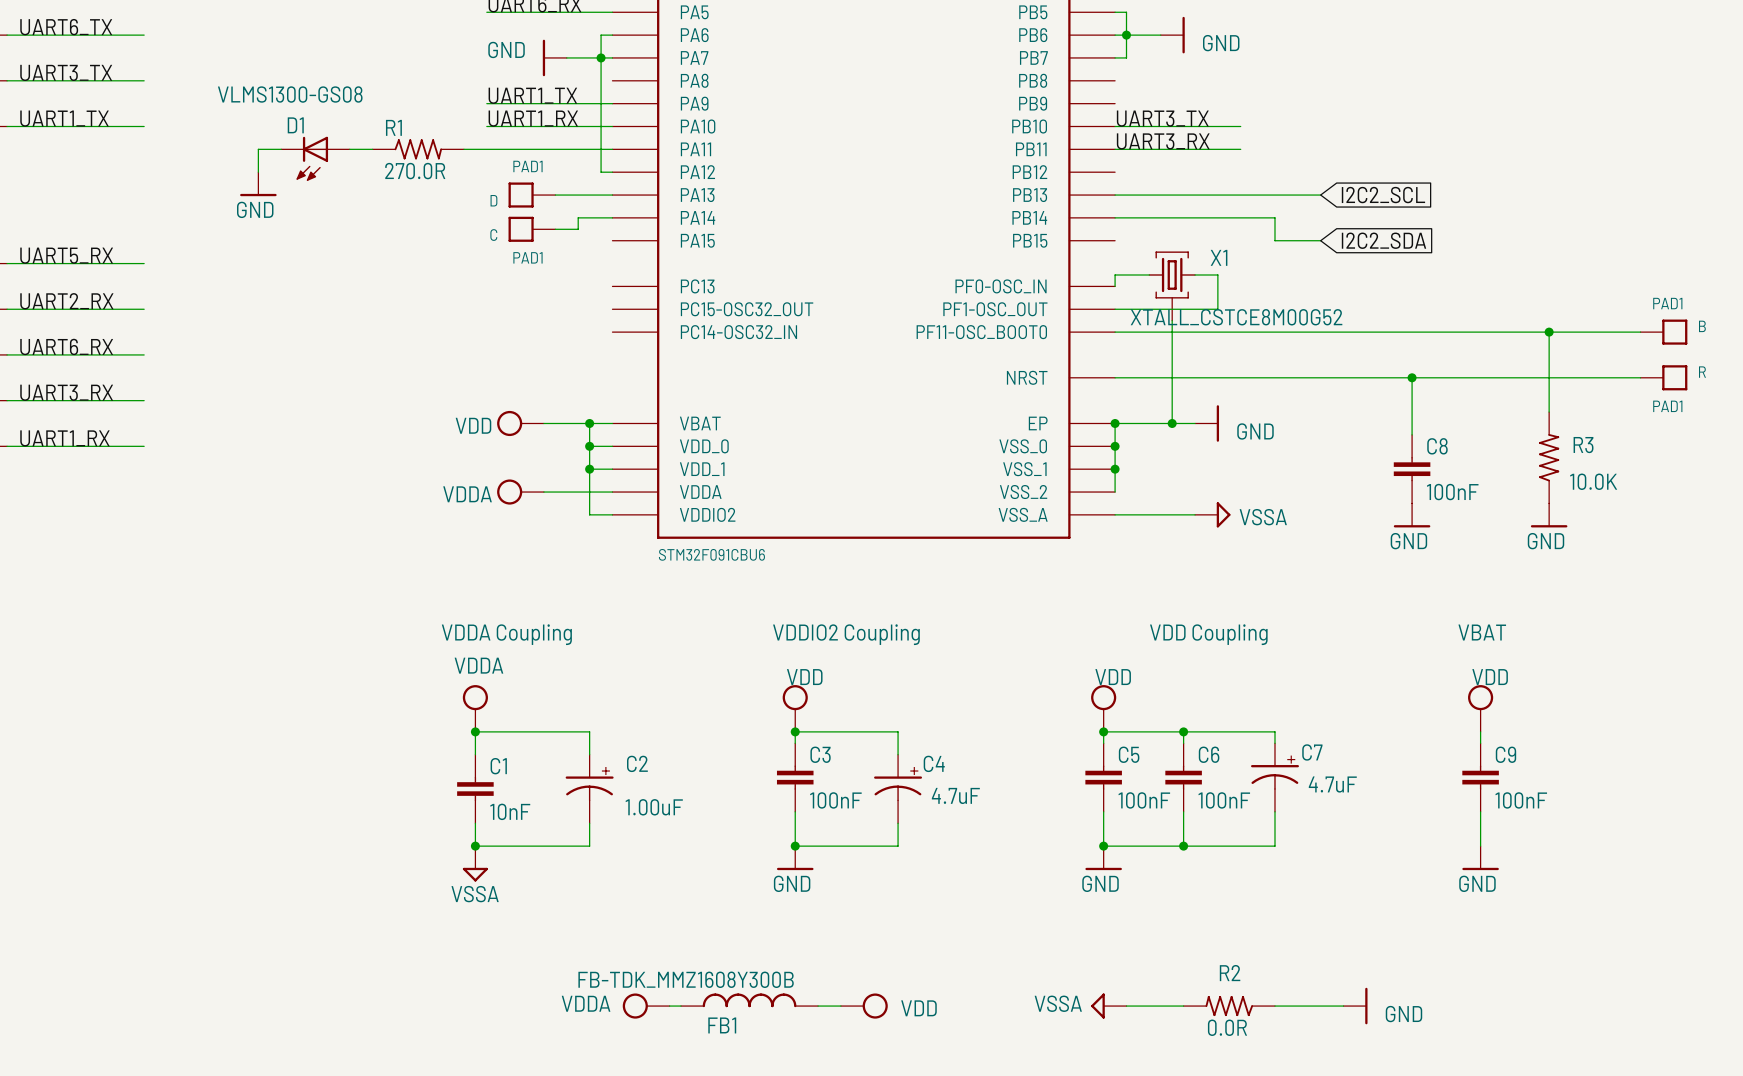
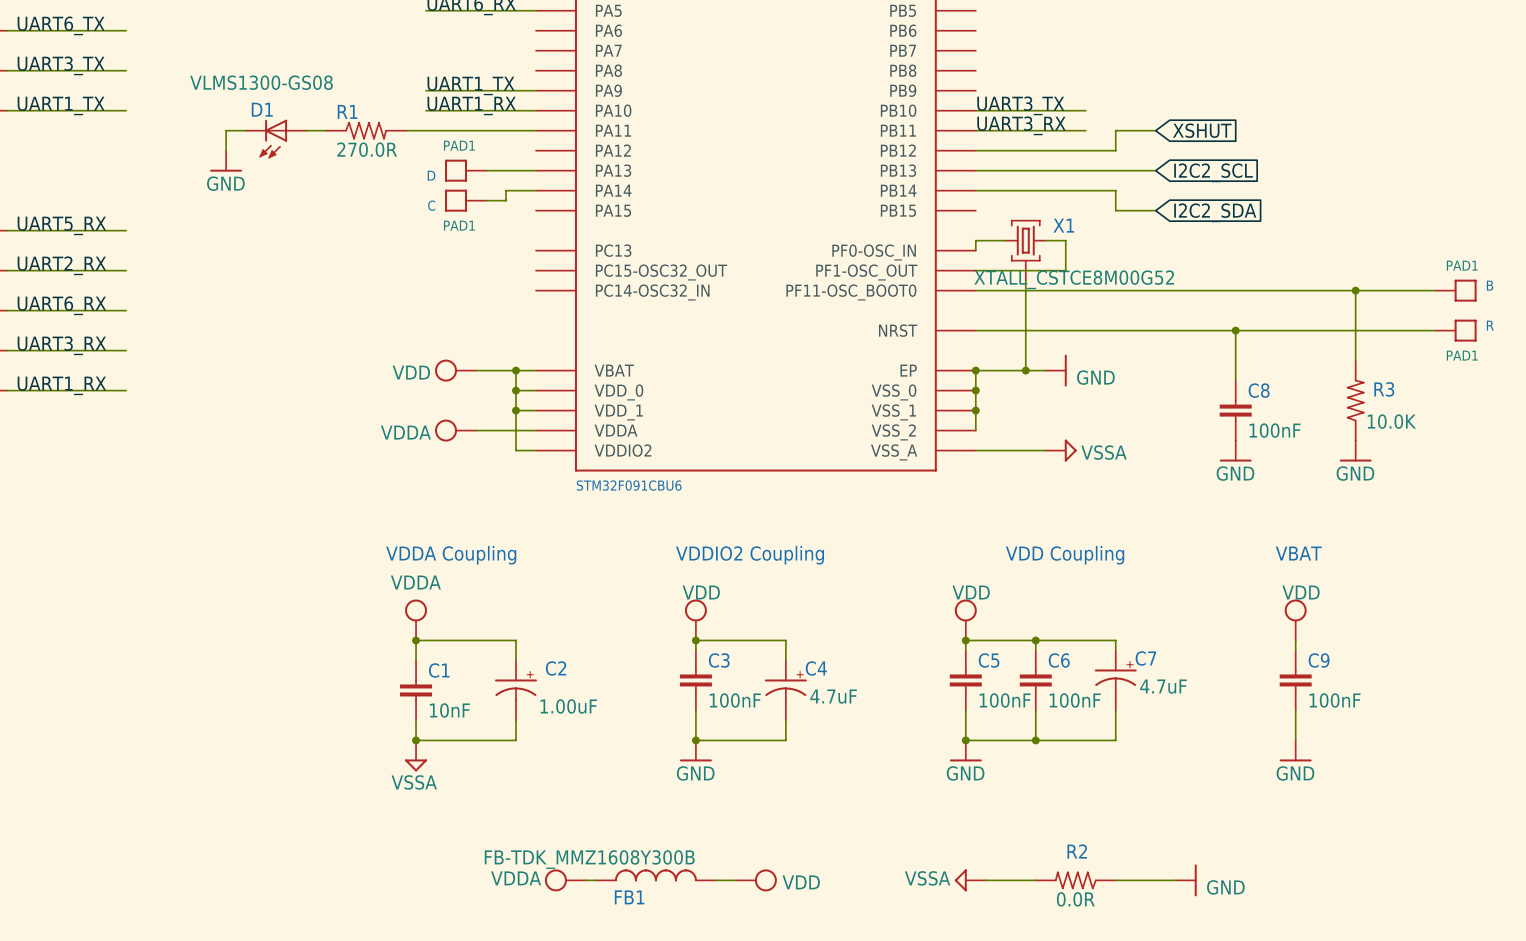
wire: (1115, 12) (1126, 12) (1126, 57) (1115, 57) -> none
wire: (612, 35) (601, 35) (601, 172) (612, 172) -> none
wire: (1115, 35) (1160, 35) -> none
junction: (1126, 35) -> none
power symbol: GND (1172, 35) -> none
power symbol: GND (554, 57) -> none
wire: (566, 57) (612, 57) -> none
junction: (601, 57) -> none
wire: none -> (1155, 130) (1115, 130) (1115, 150) (975, 150)
global label: none -> XSHUT (1202, 130)

